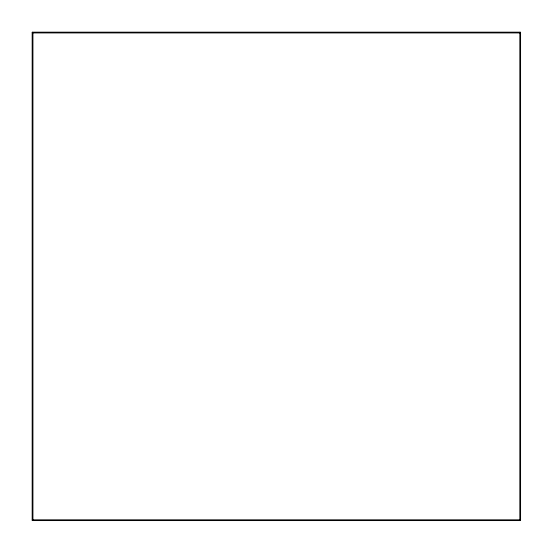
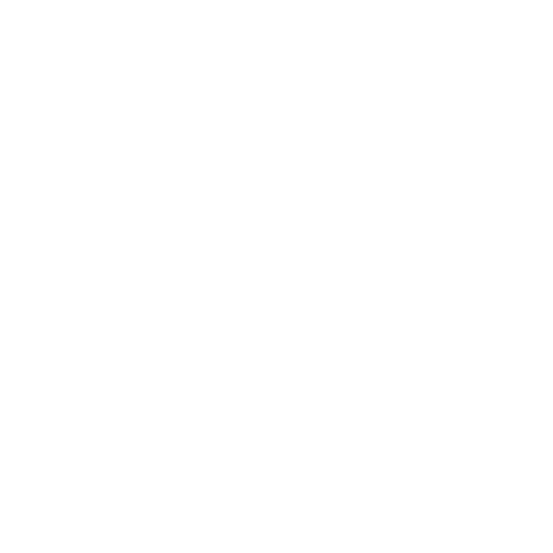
board edge: (520, 32) (32, 32) (32, 520) (520, 520) (520, 32) -> none

